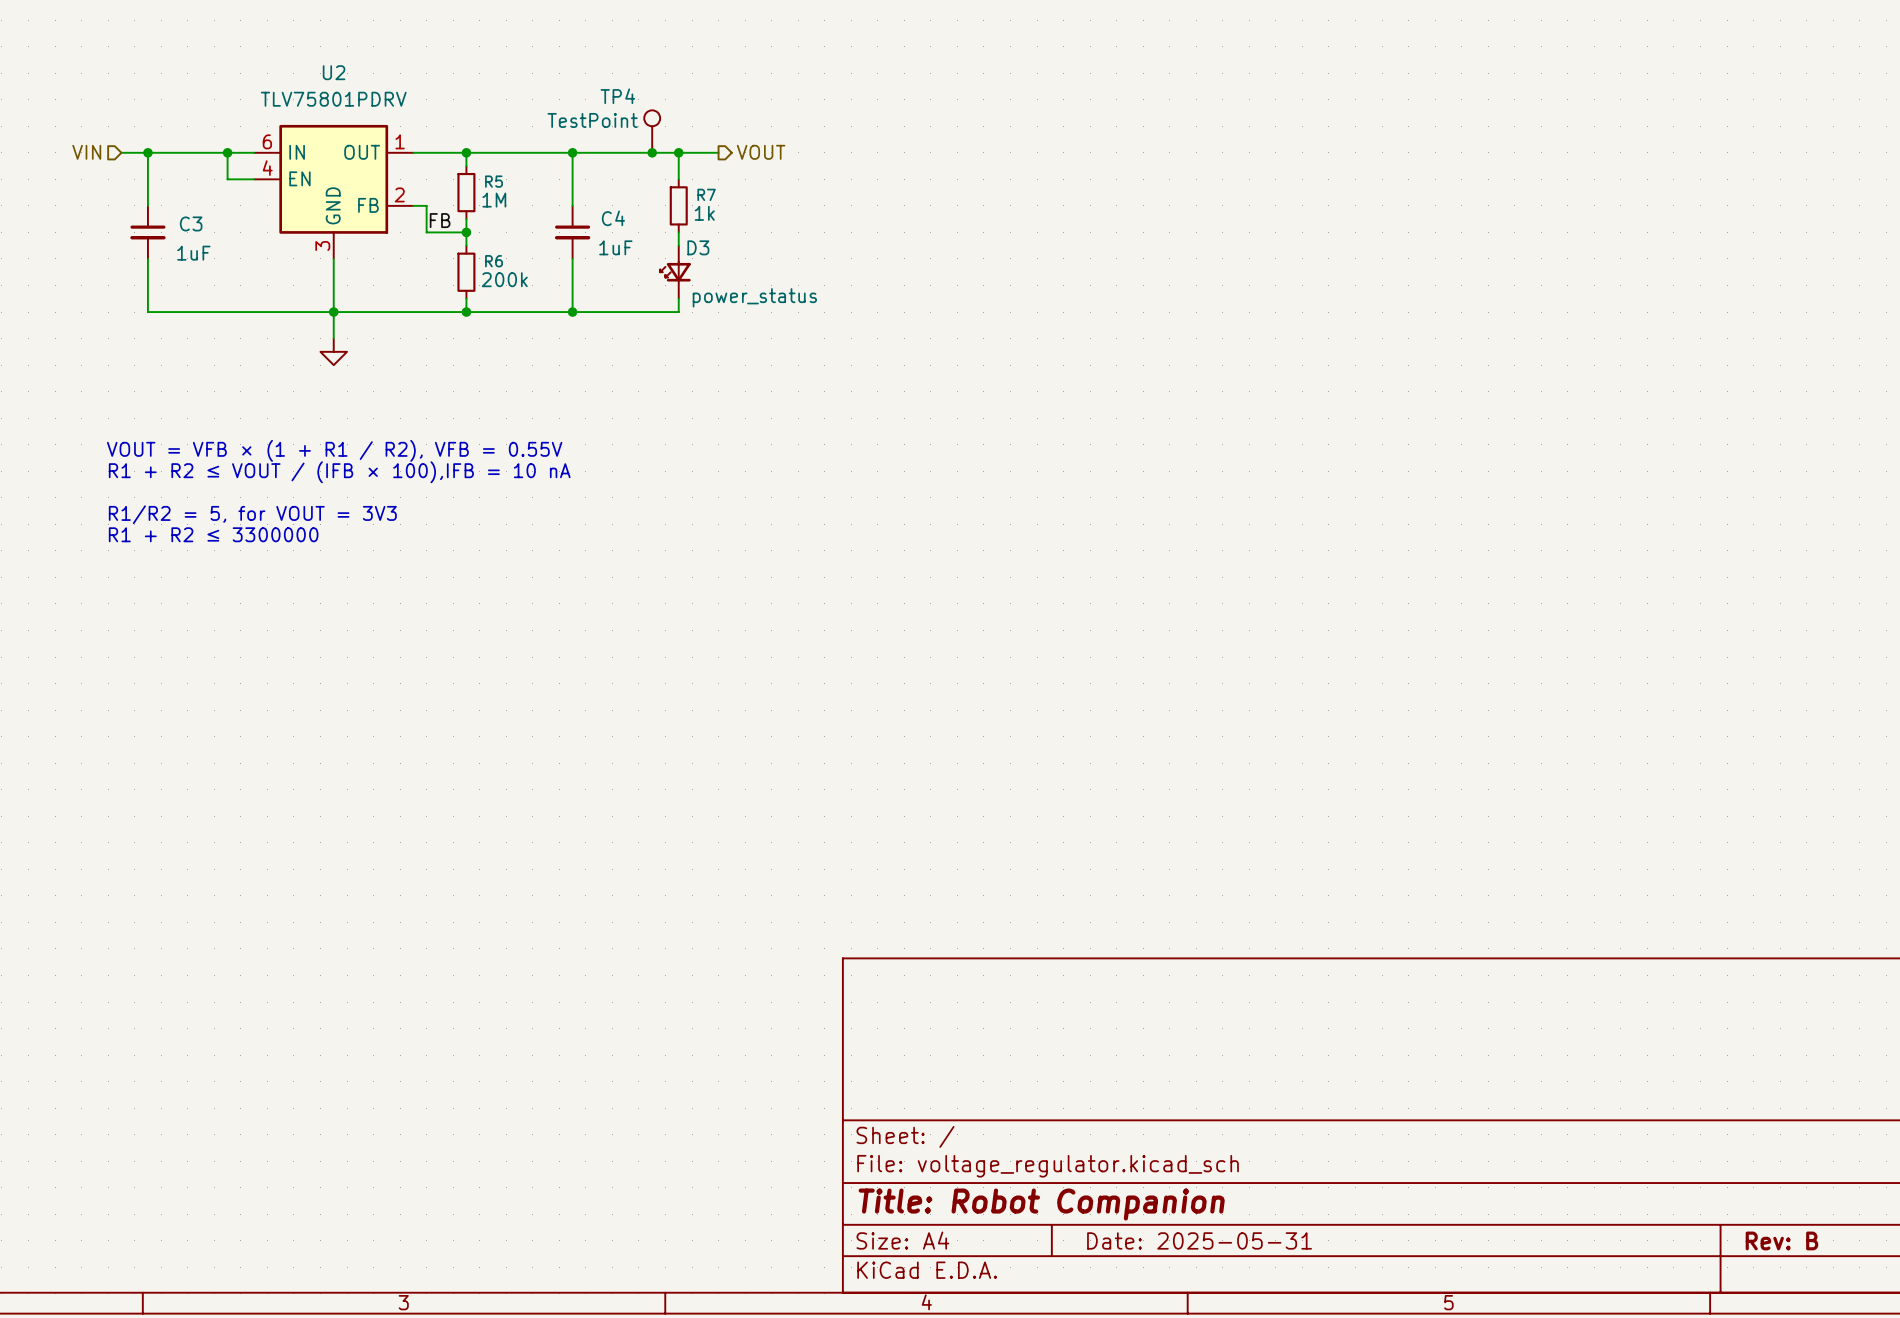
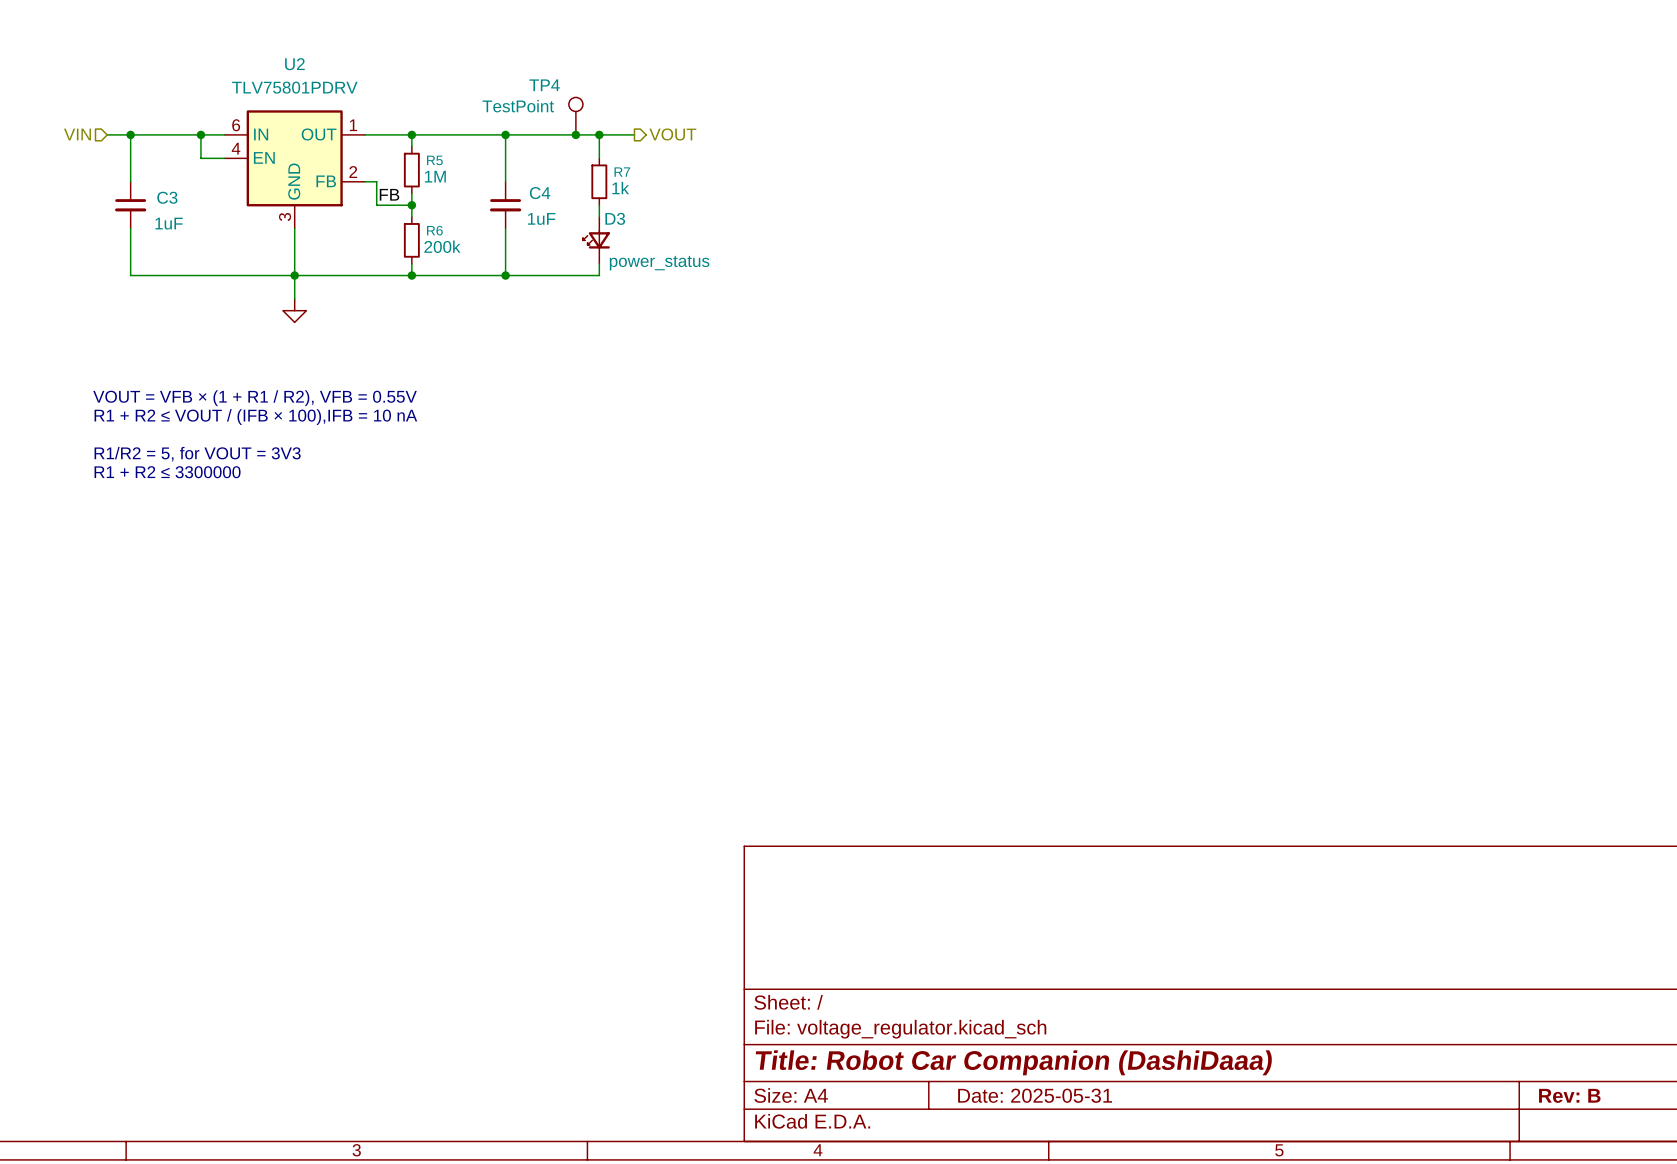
title block: Title: Robot Companion (1041, 1204) -> Title: Robot Car Companion (DashiDaaa) (1013, 1062)

